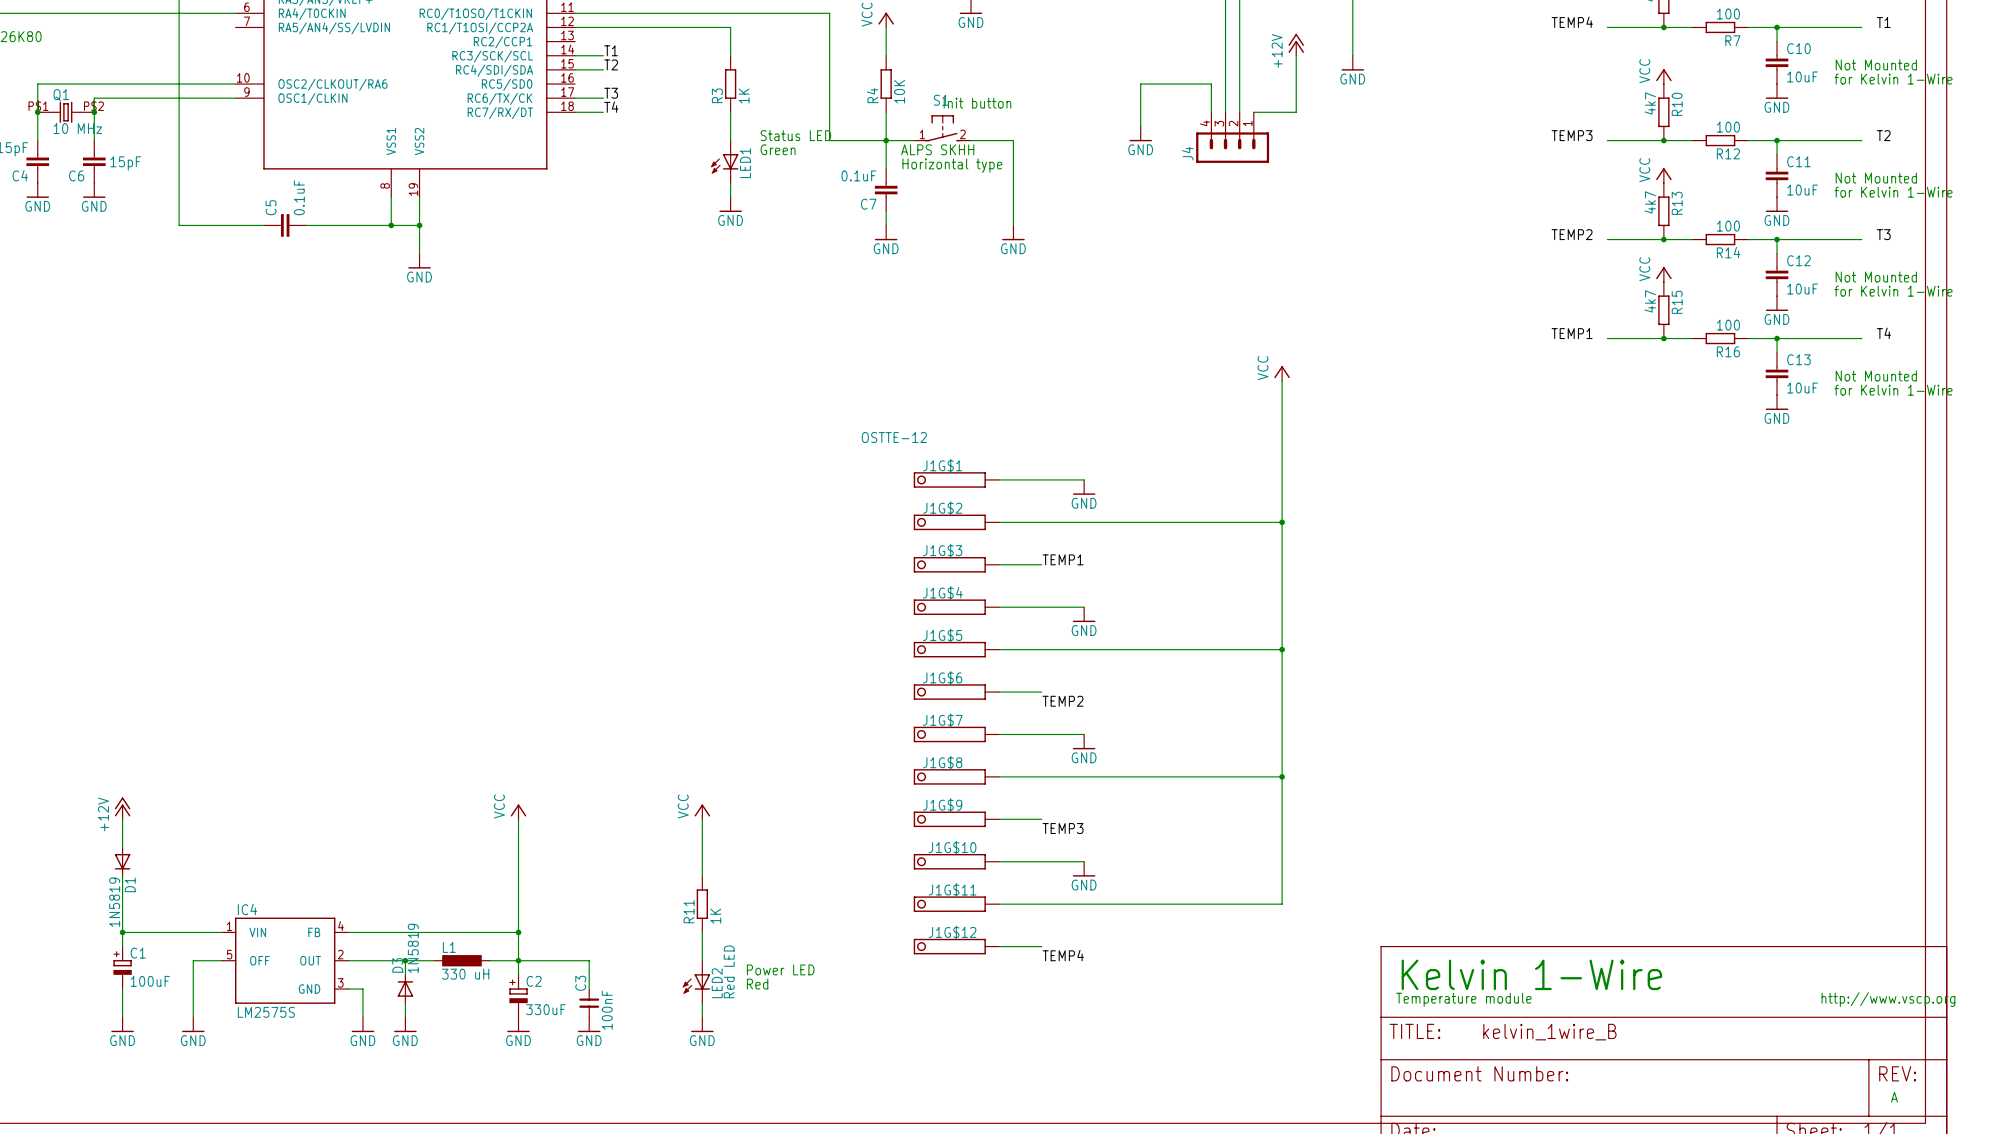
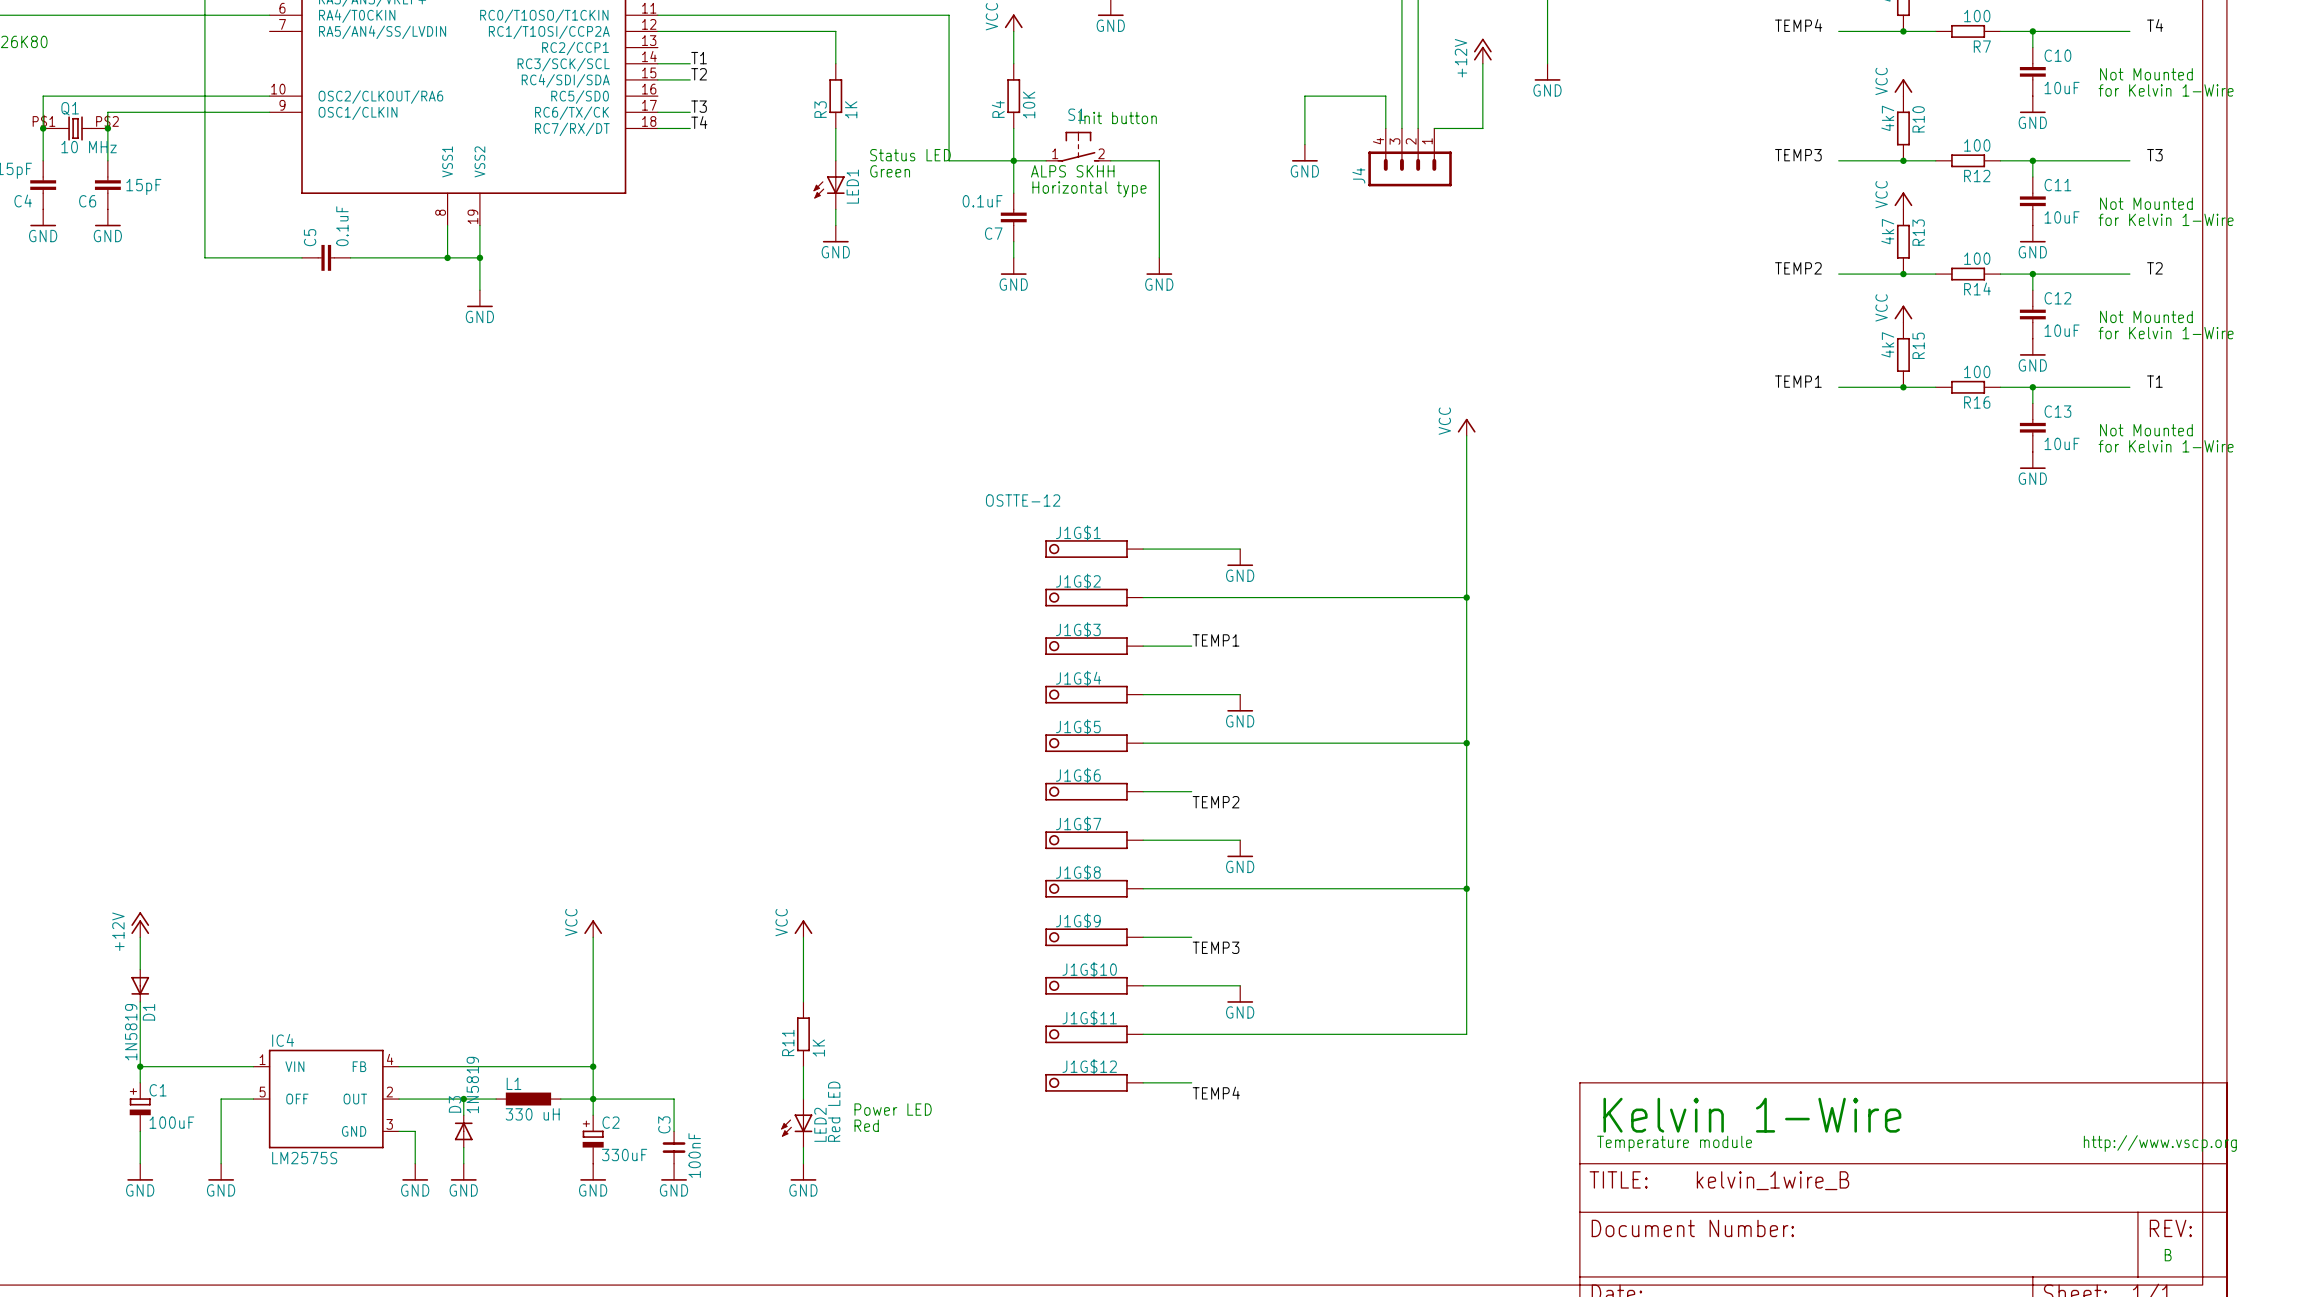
label: T1 (1883, 22) -> T4 (2155, 25)
label: T2 (1883, 135) -> T3 (2154, 155)
label: T3 (1883, 234) -> T2 (2154, 268)
label: T4 (1883, 333) -> T1 (2154, 381)
text: A (1894, 1097) -> B (2168, 1255)

